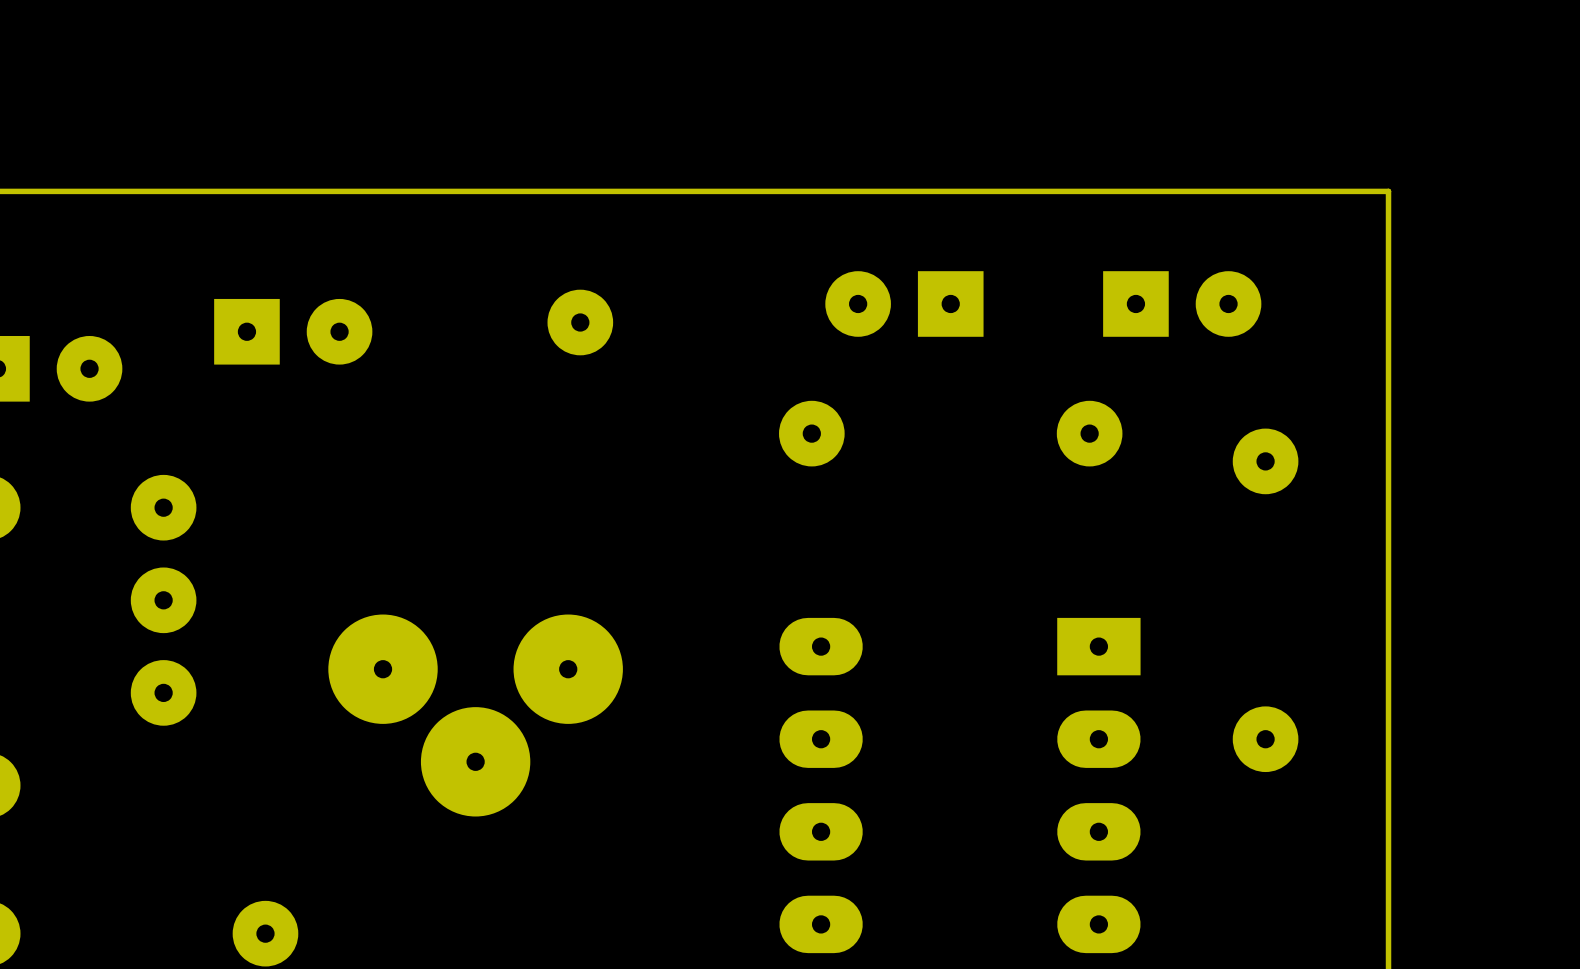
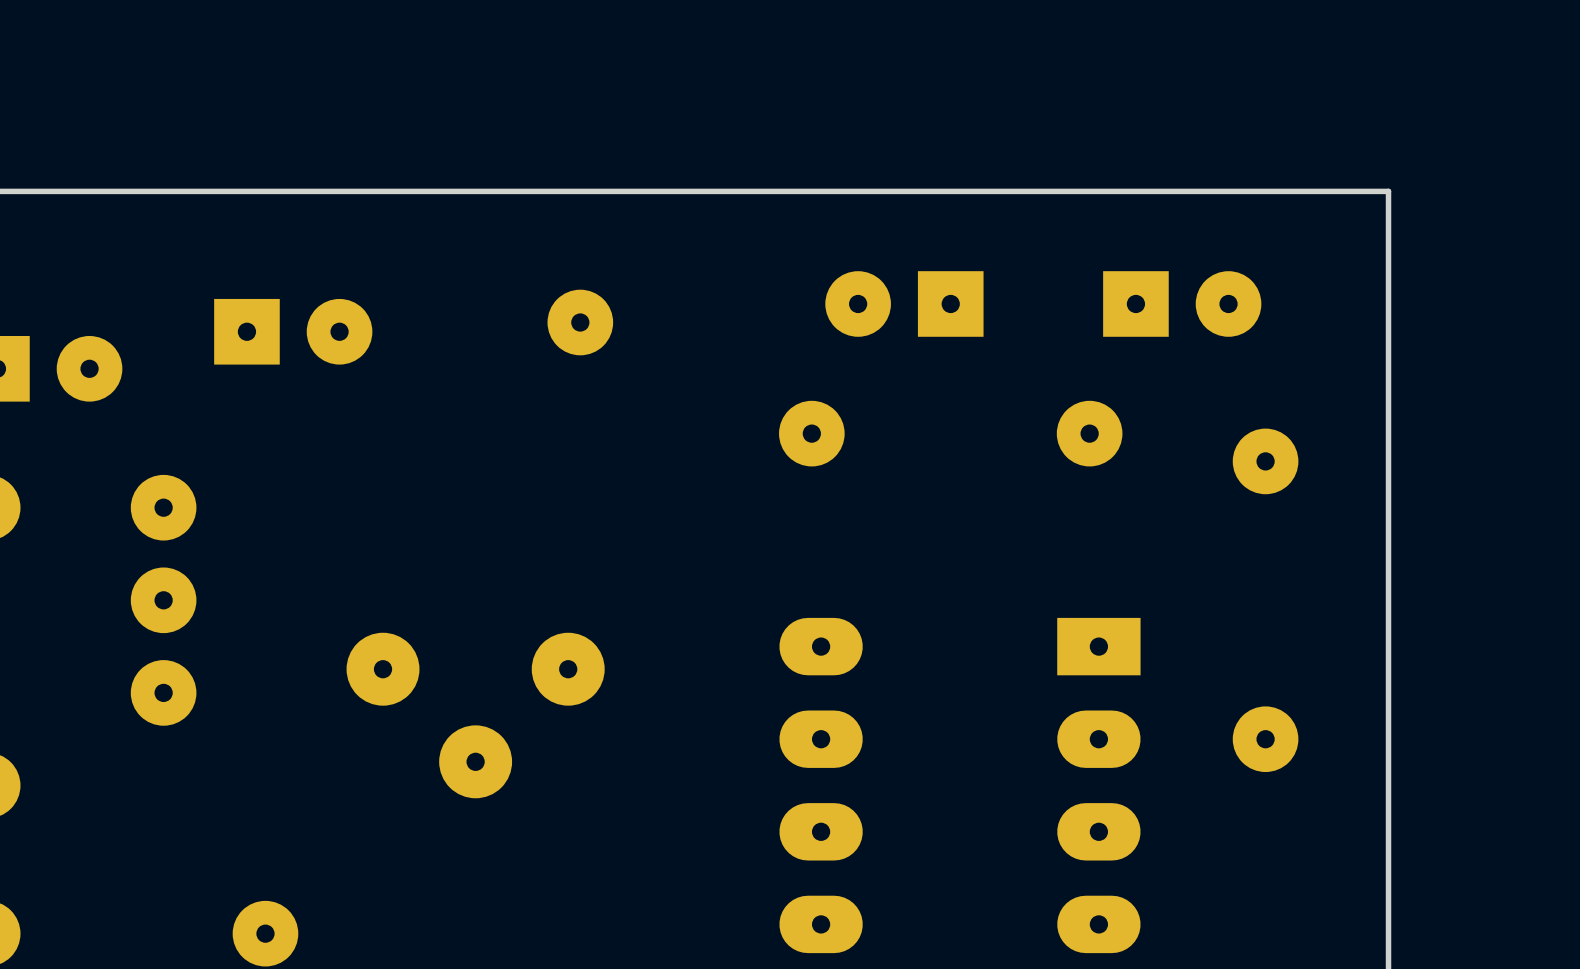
part footprint: [328, 614, 623, 817] -> [346, 632, 605, 799]

